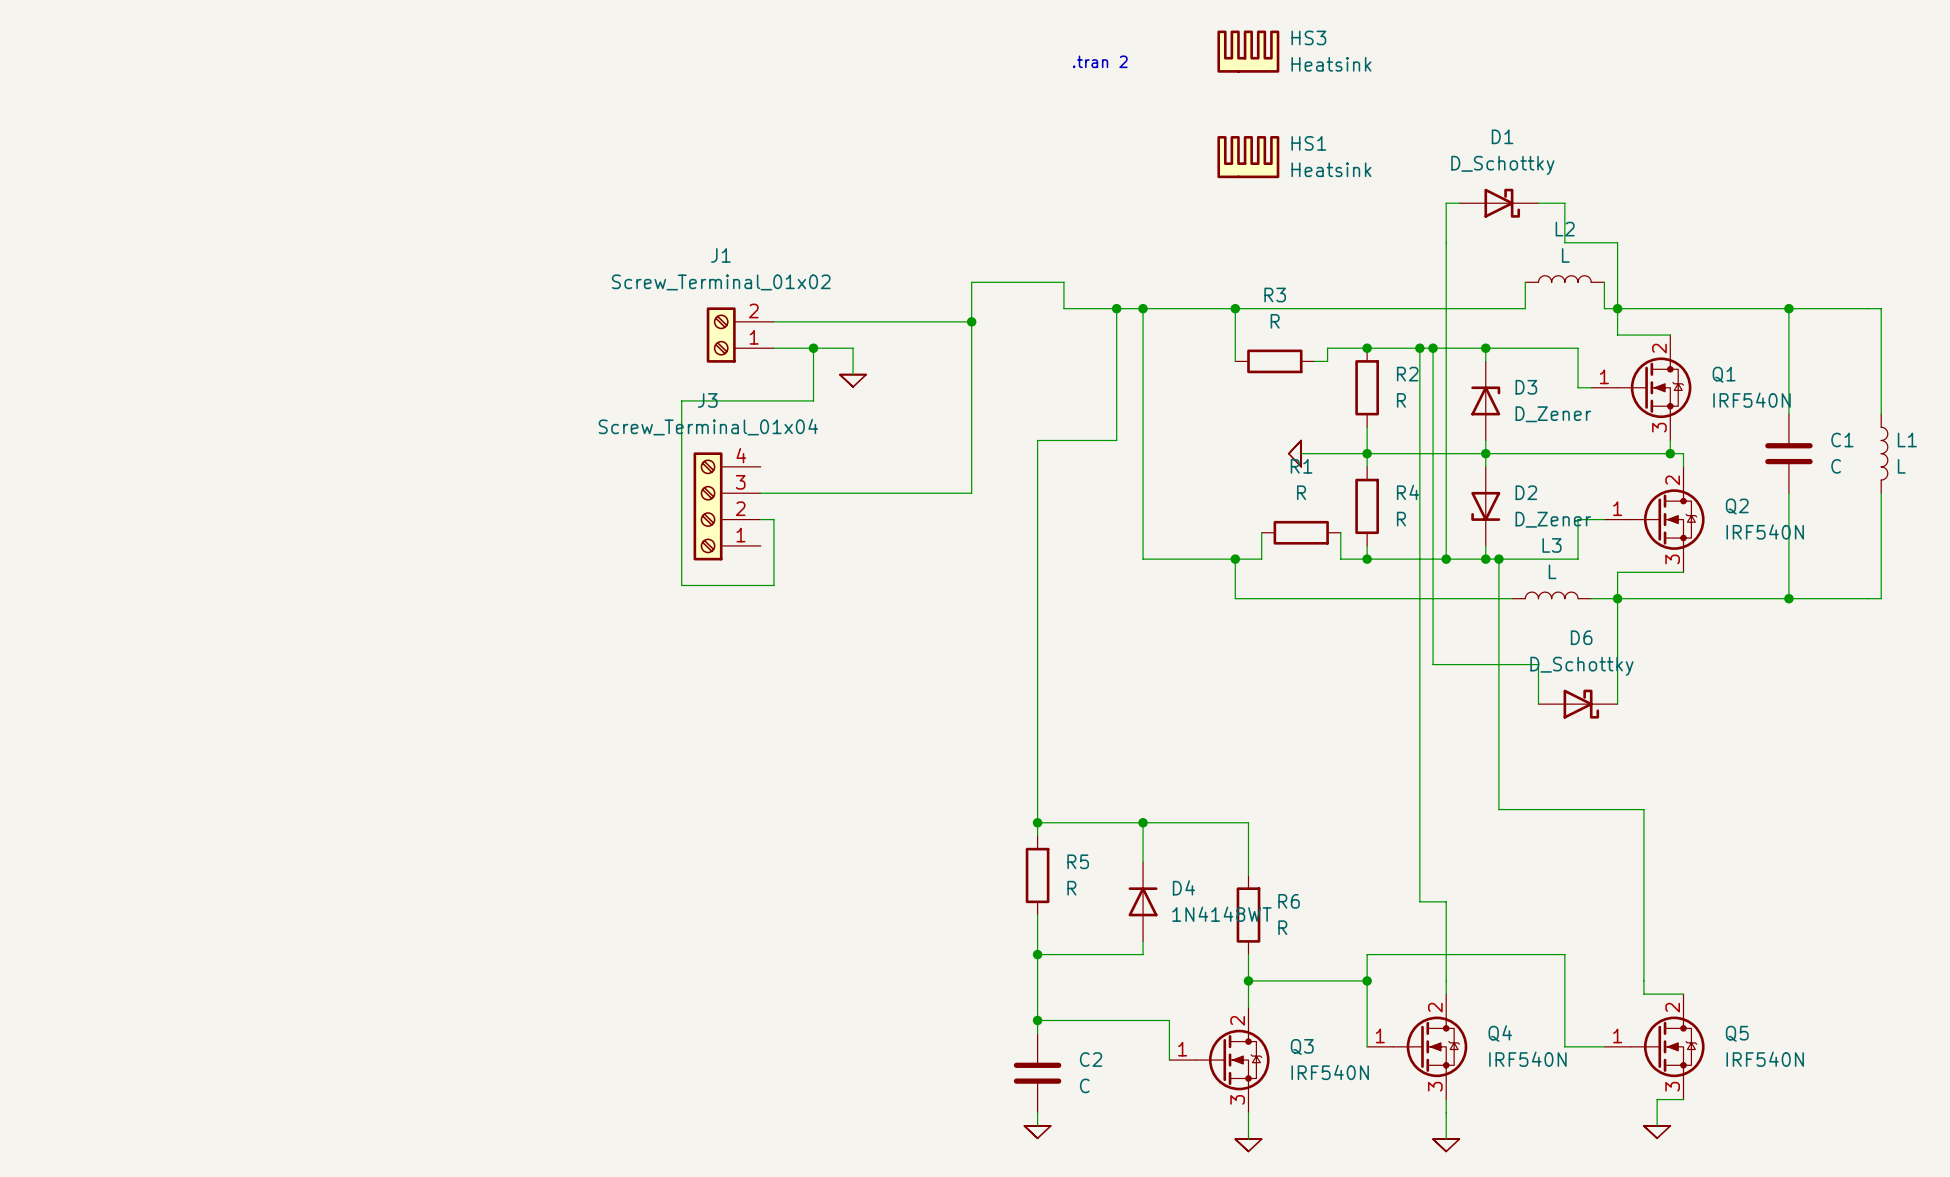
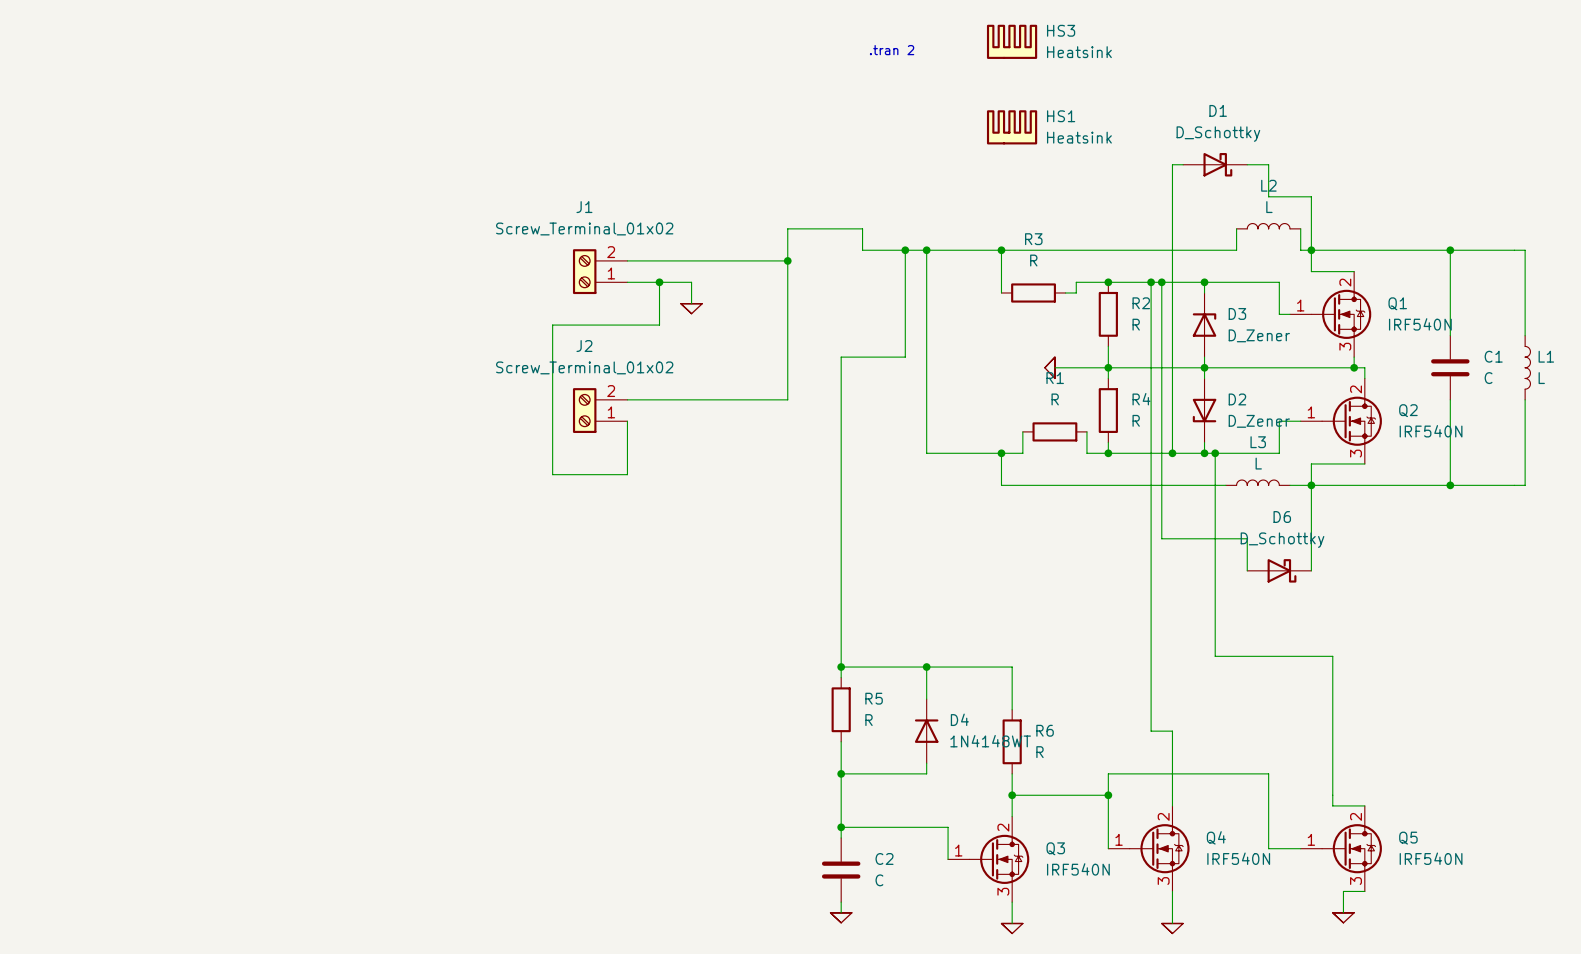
J3: Screw_Terminal_01x04 (727, 506) -> none
J2: none -> Screw_Terminal_01x02 (600, 410)

